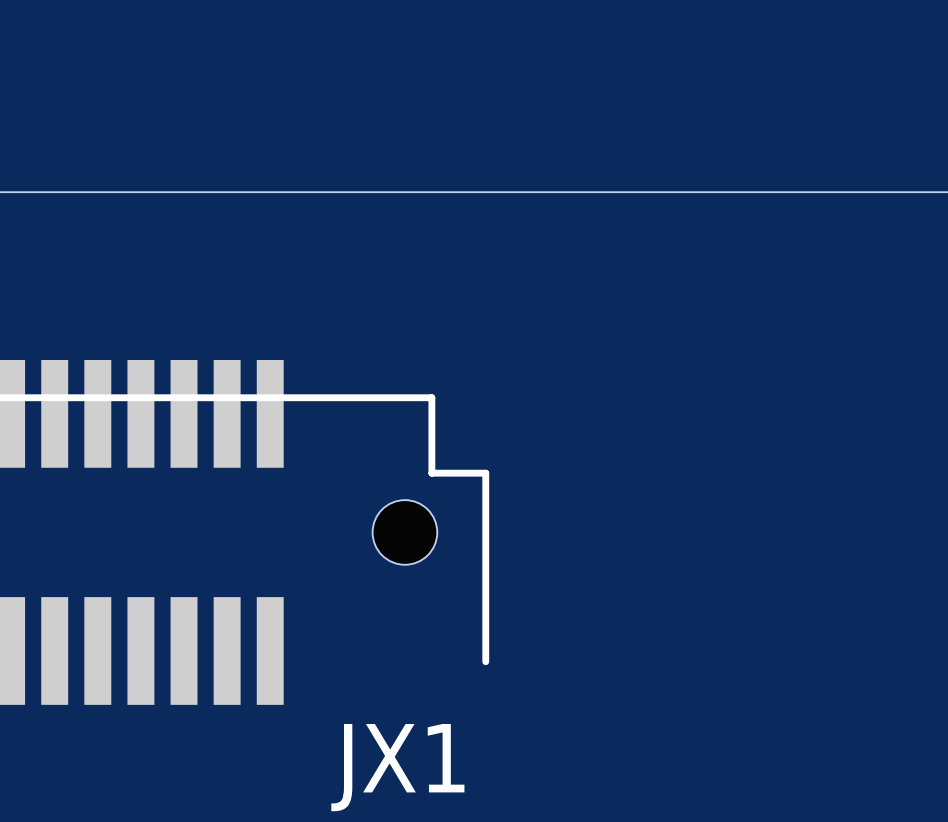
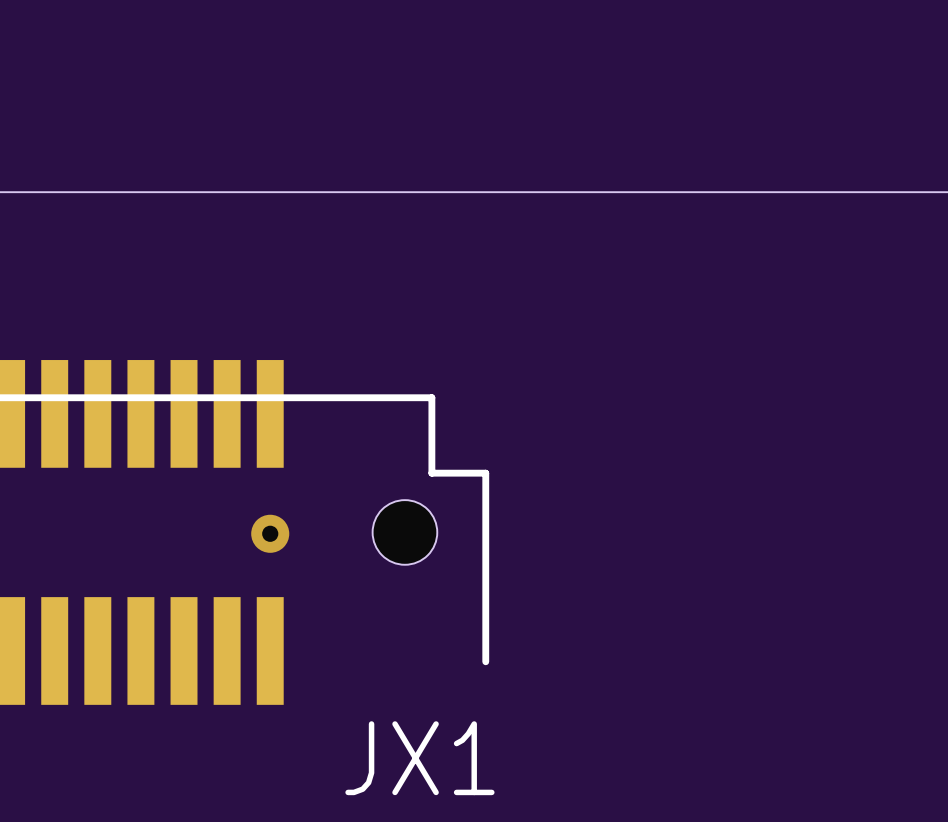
via: none -> (270, 533)

